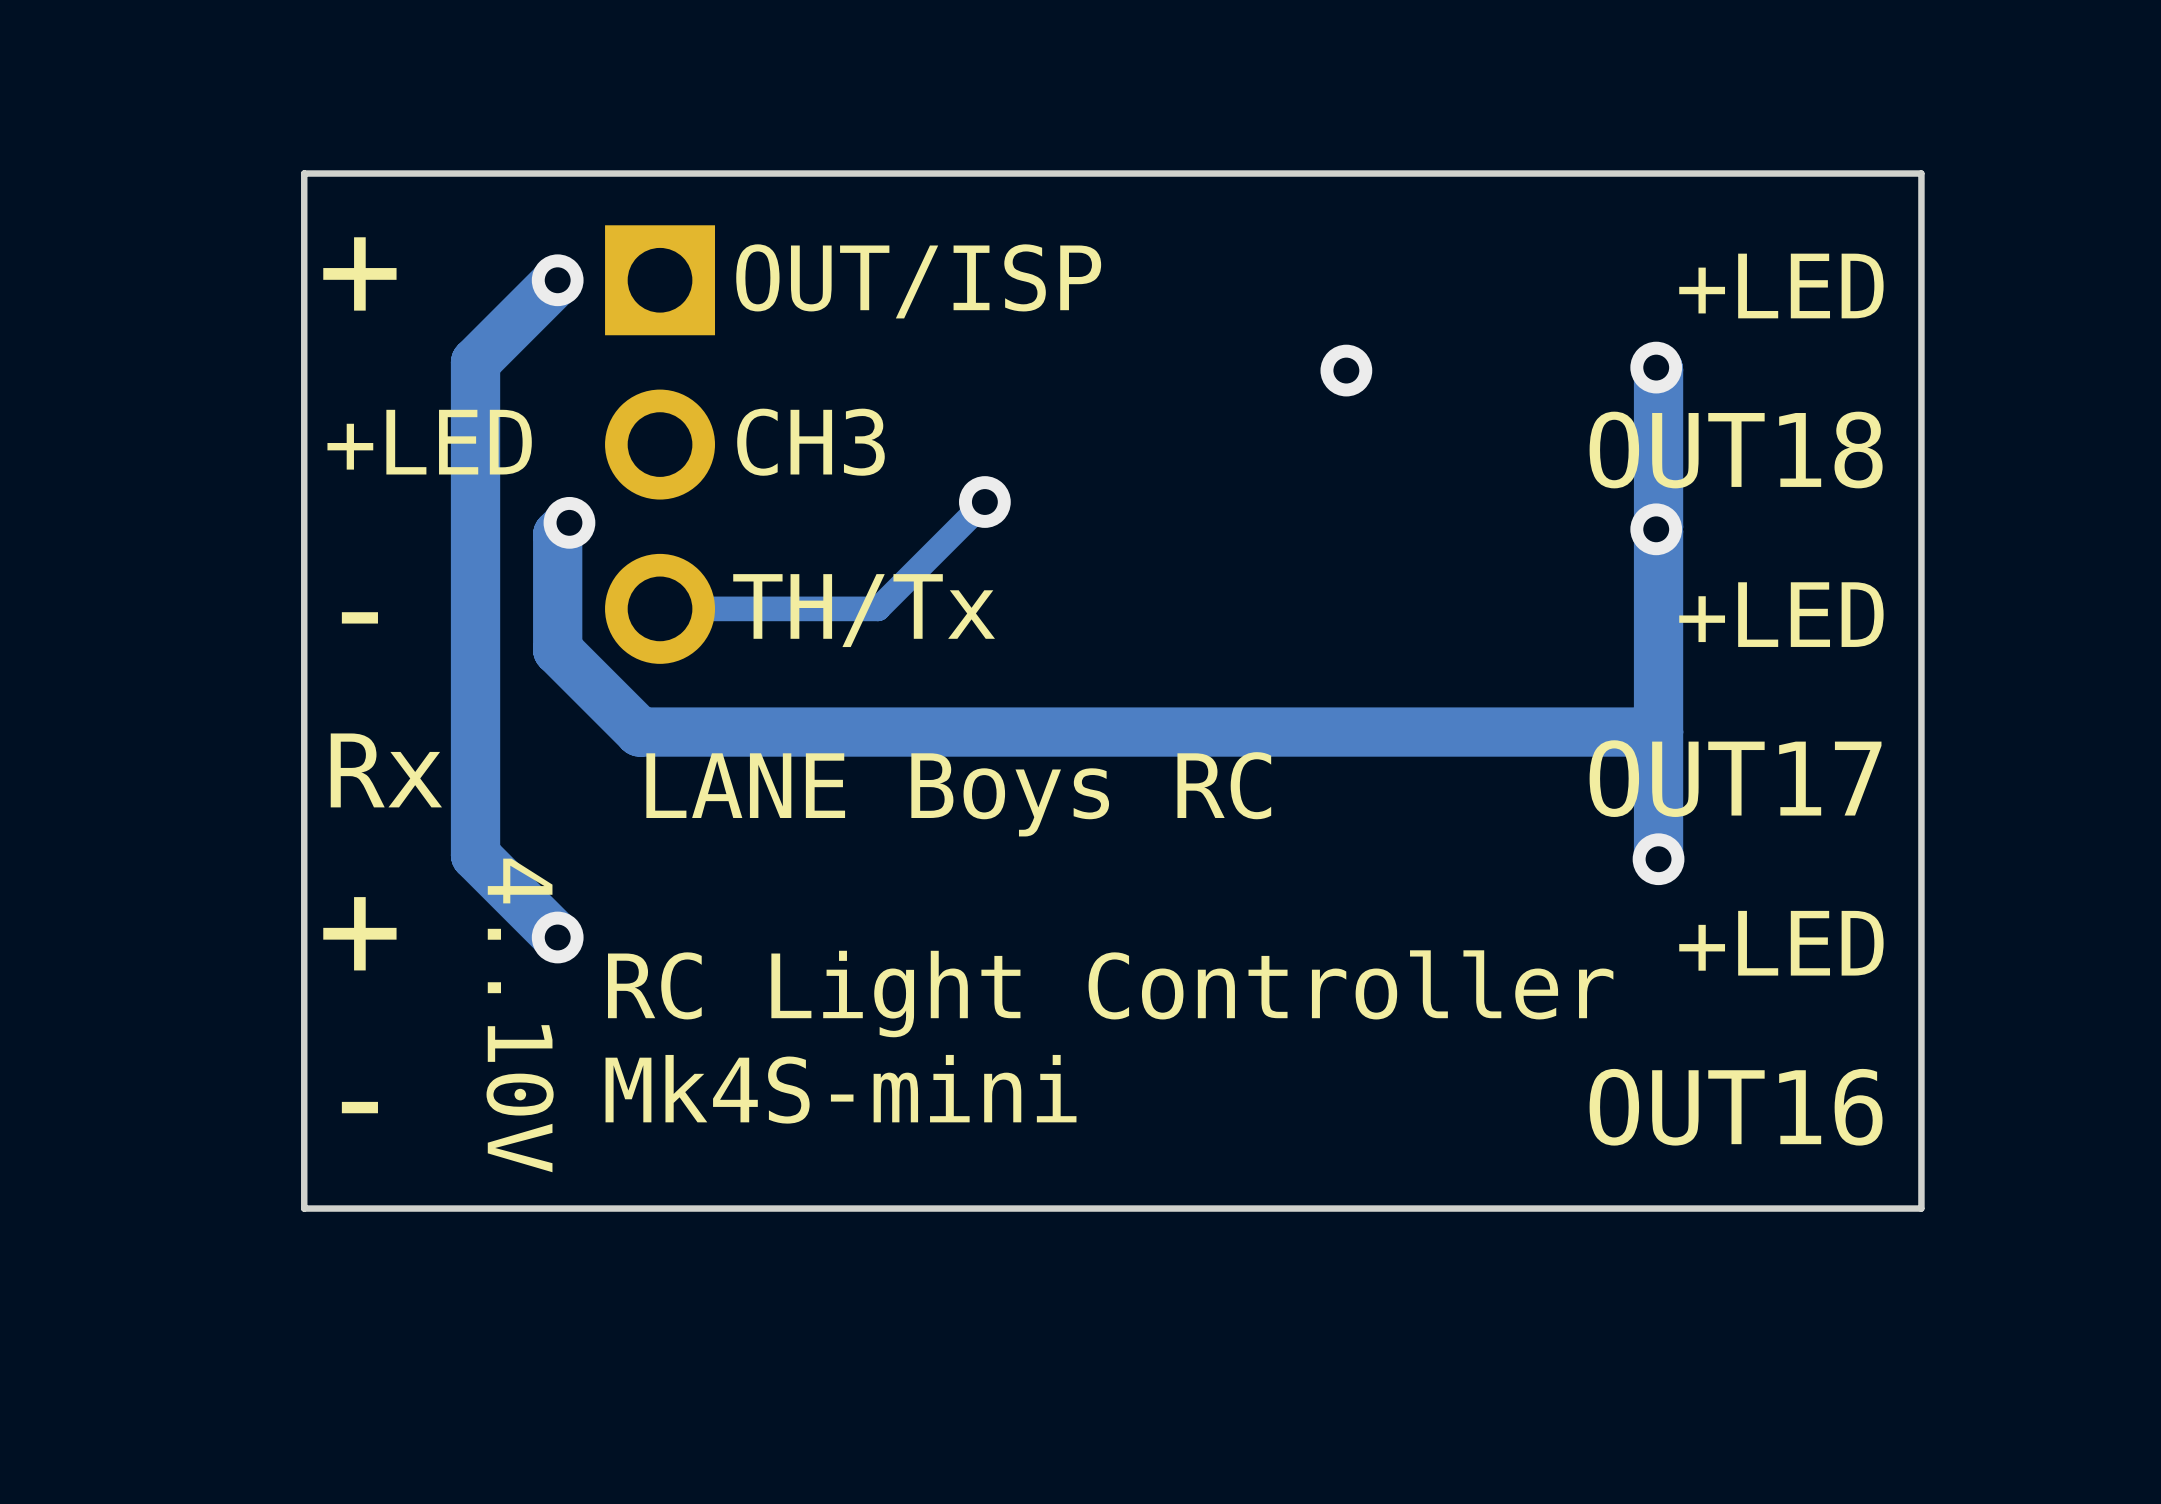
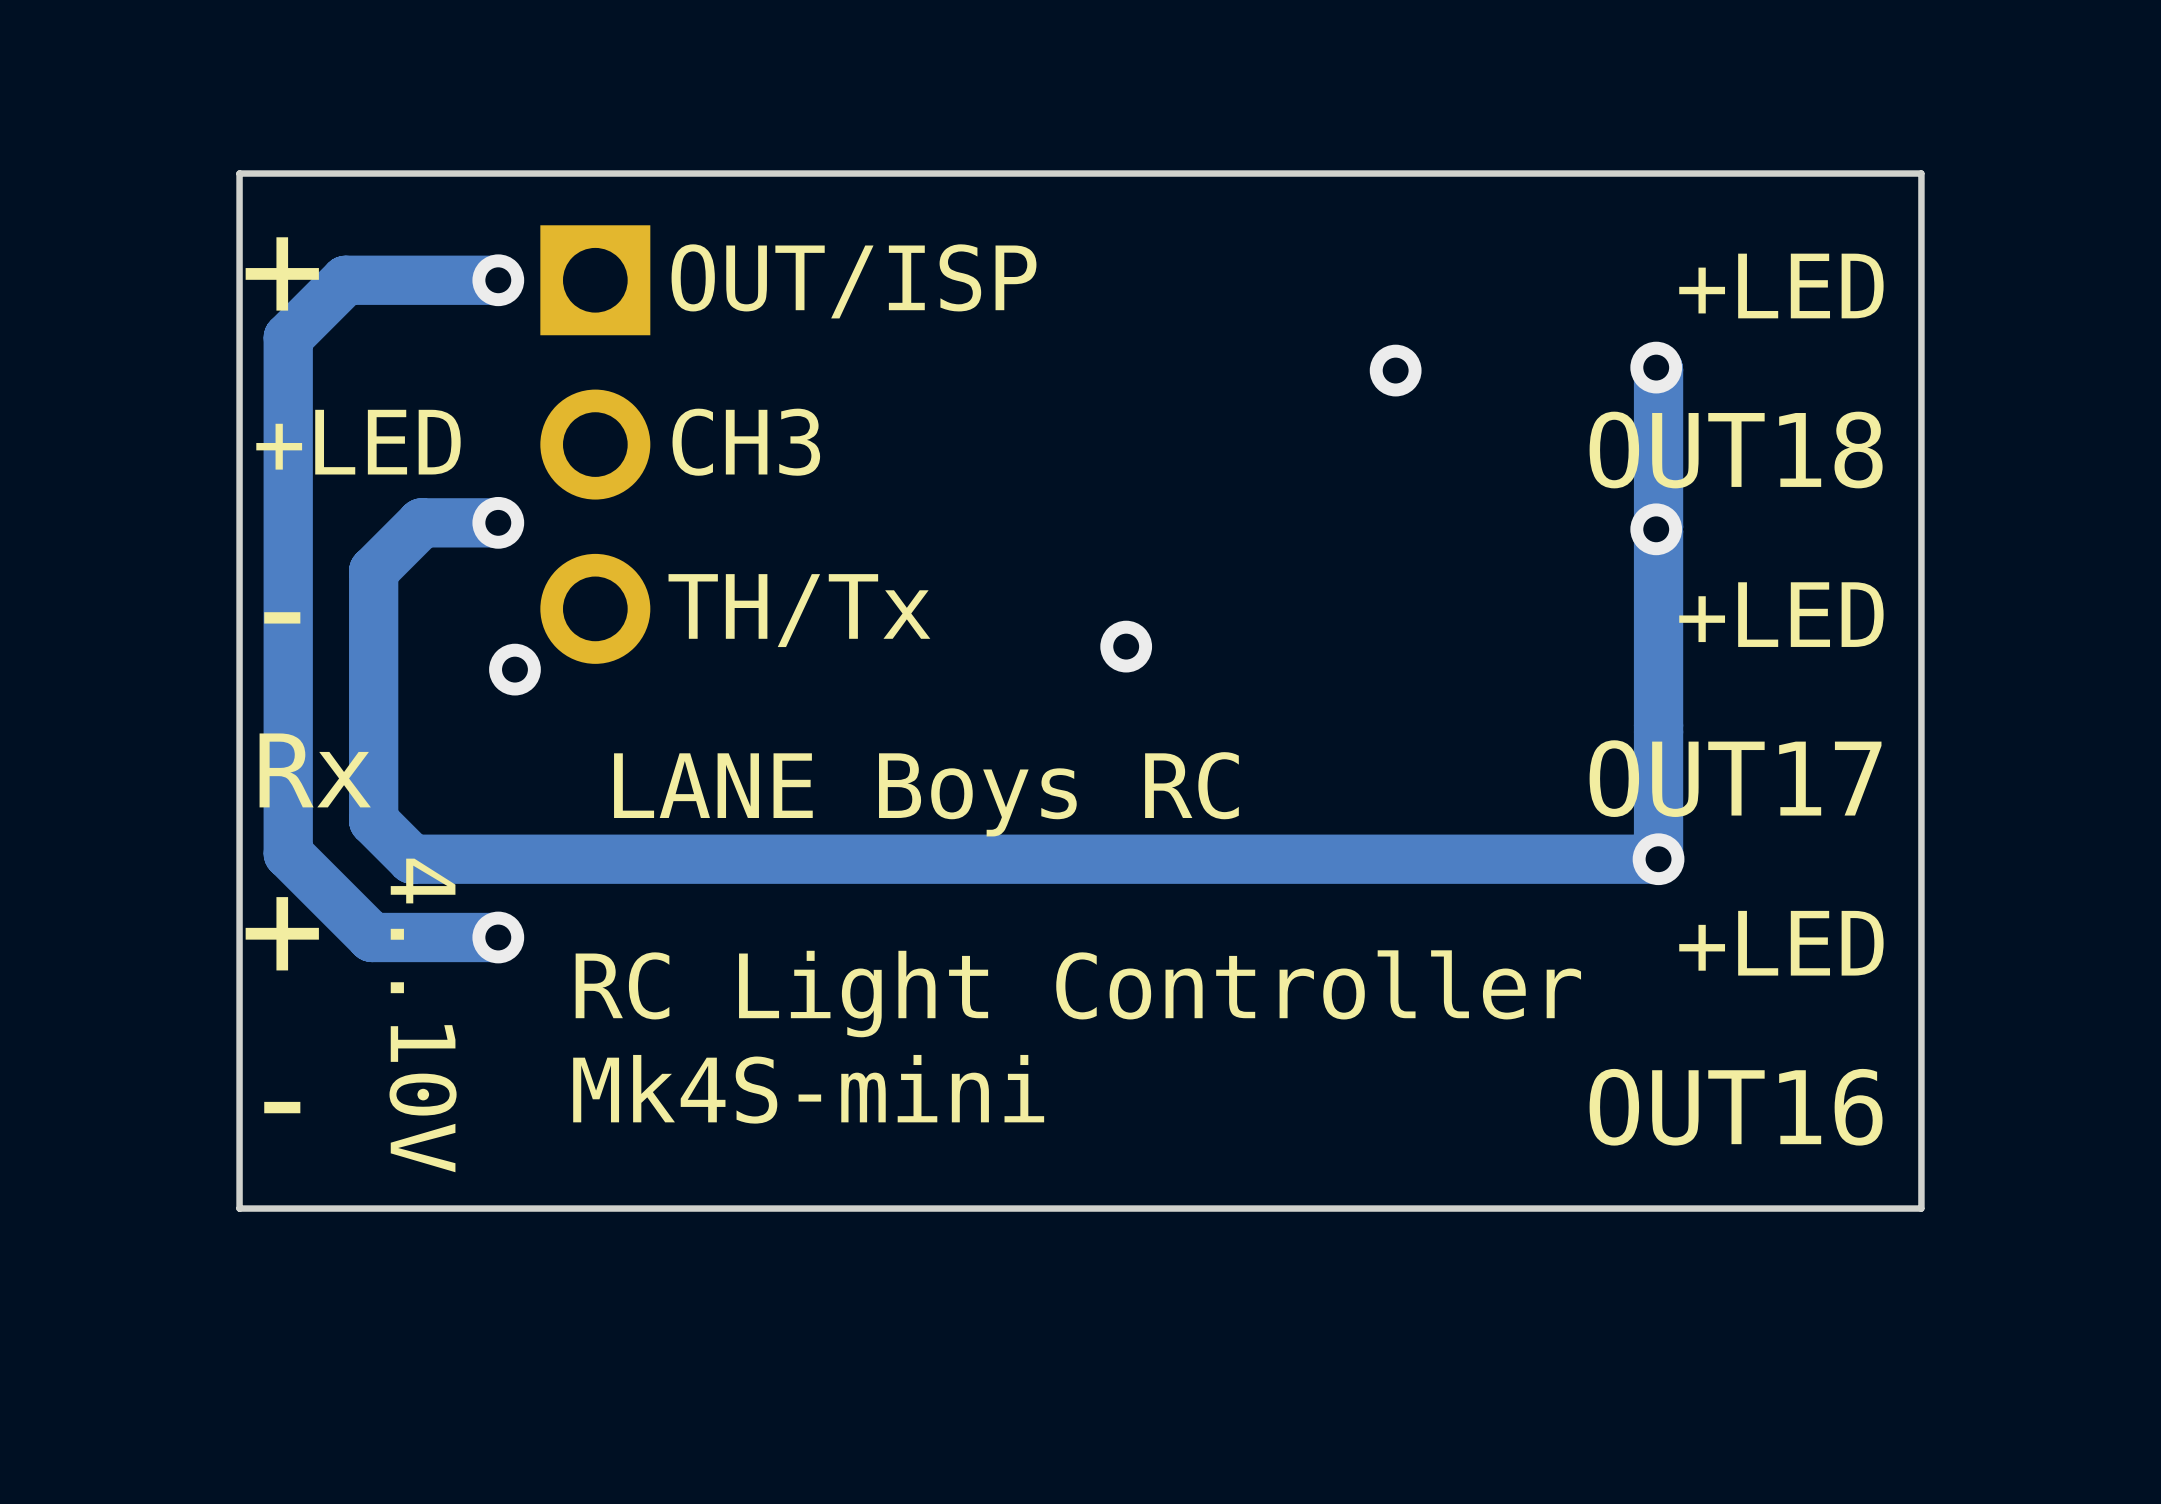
board edge: (304, 173) (304, 1208) -> (304, 173) (239, 173) (239, 1208) (304, 1208)
text position: + (359, 273) -> + (282, 273)
track: none -> (498, 280) (345, 280) (288, 337) (288, 853) (372, 937) (498, 937)
track: (557, 280) (475, 362) (475, 855) (557, 937) -> none
via position: (557, 280) -> (498, 280)
text position: OUT/ISP (918, 281) -> OUT/ISP (854, 281)
via position: (1346, 370) -> (1395, 370)
text position: +LED (429, 442) -> +LED (358, 442)
text position: CH3 (810, 442) -> CH3 (746, 442)
part position: (660, 444) -> (595, 444)
track: (984, 502) (878, 608) (660, 608) -> none
via: (984, 502) -> none
track: none -> (498, 522) (421, 522) (373, 571) (373, 820) (412, 859) (1658, 859)
track: (569, 522) (557, 534) (557, 649) (639, 732) (1658, 732) -> none
via position: (569, 522) -> (498, 522)
text position: TH/Tx (864, 610) -> TH/Tx (799, 610)
text position: - (359, 617) -> - (282, 617)
via: none -> (1126, 646)
via: none -> (514, 669)
text position: Rx (386, 770) -> Rx (315, 770)
text position: LANE Boys RC (958, 794) -> LANE Boys RC (926, 794)
text position: + (359, 933) -> + (282, 933)
via position: (557, 937) -> (498, 937)
text position: RC Light Controller (1110, 993) -> RC Light Controller (1078, 993)
text position: 4..10V (520, 1015) -> 4..10V (423, 1015)
text position: Mk4S-mini (841, 1089) -> Mk4S-mini (808, 1089)
text position: - (359, 1107) -> - (282, 1107)

